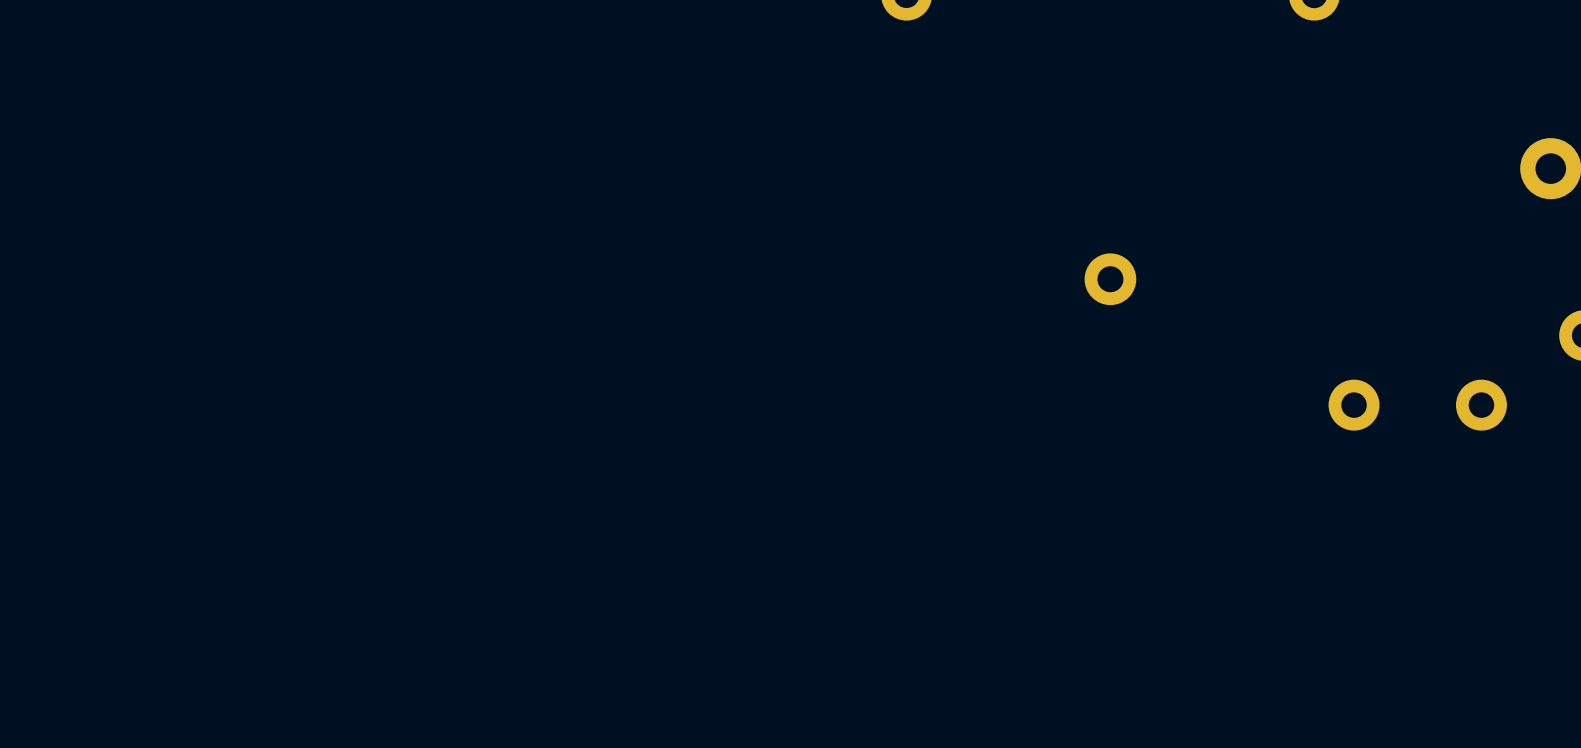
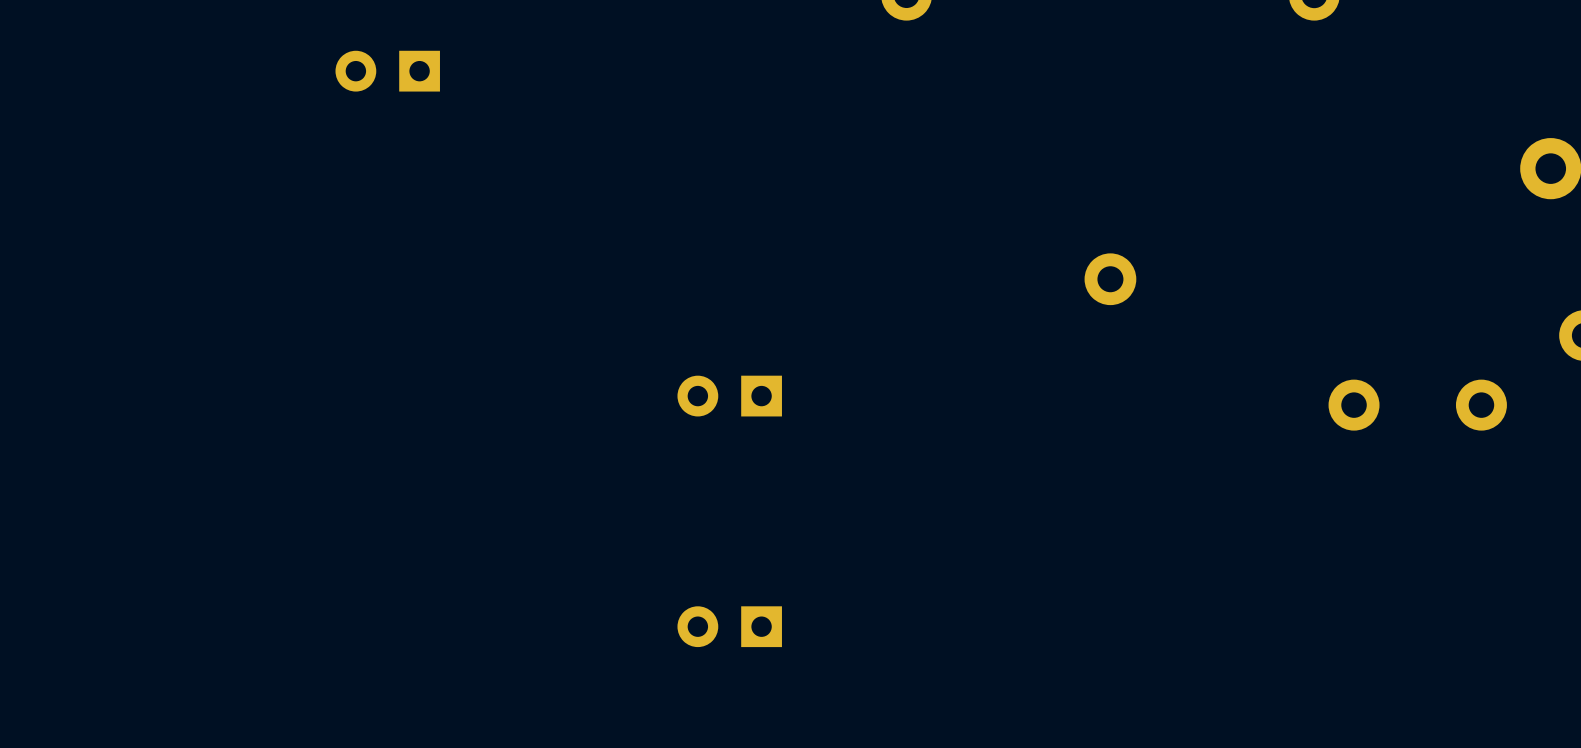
part: none -> (387, 71)
part: none -> (729, 396)
part: none -> (729, 626)

